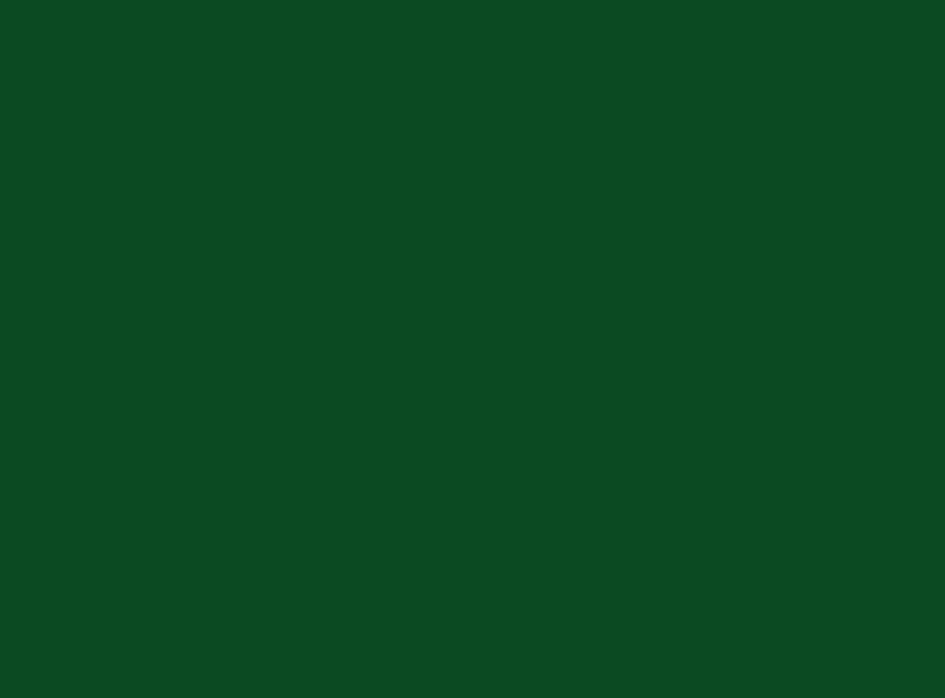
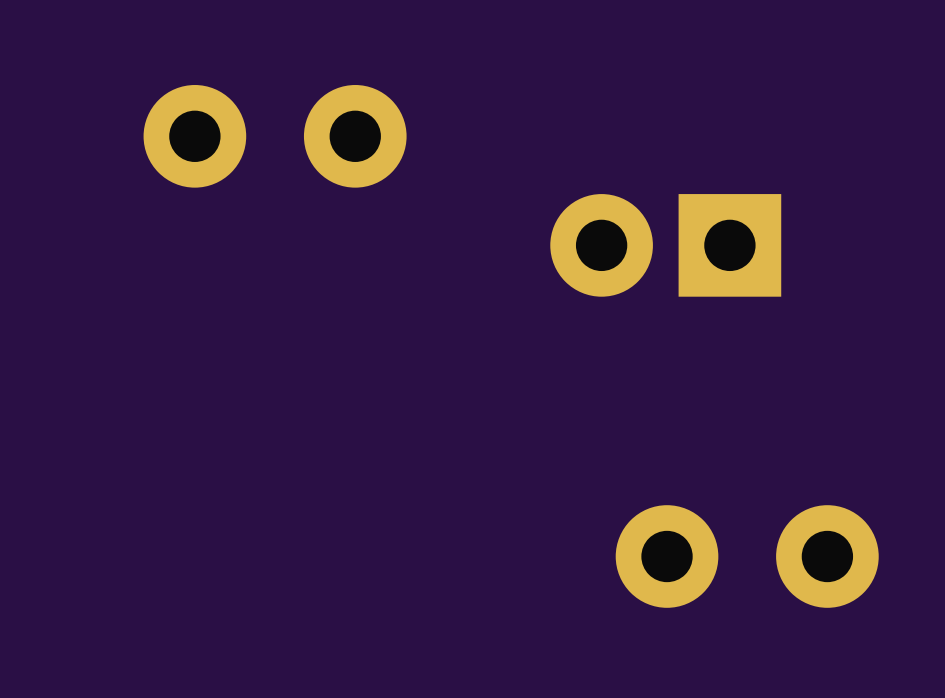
part: none -> (275, 136)
part: none -> (665, 245)
part: none -> (747, 556)

